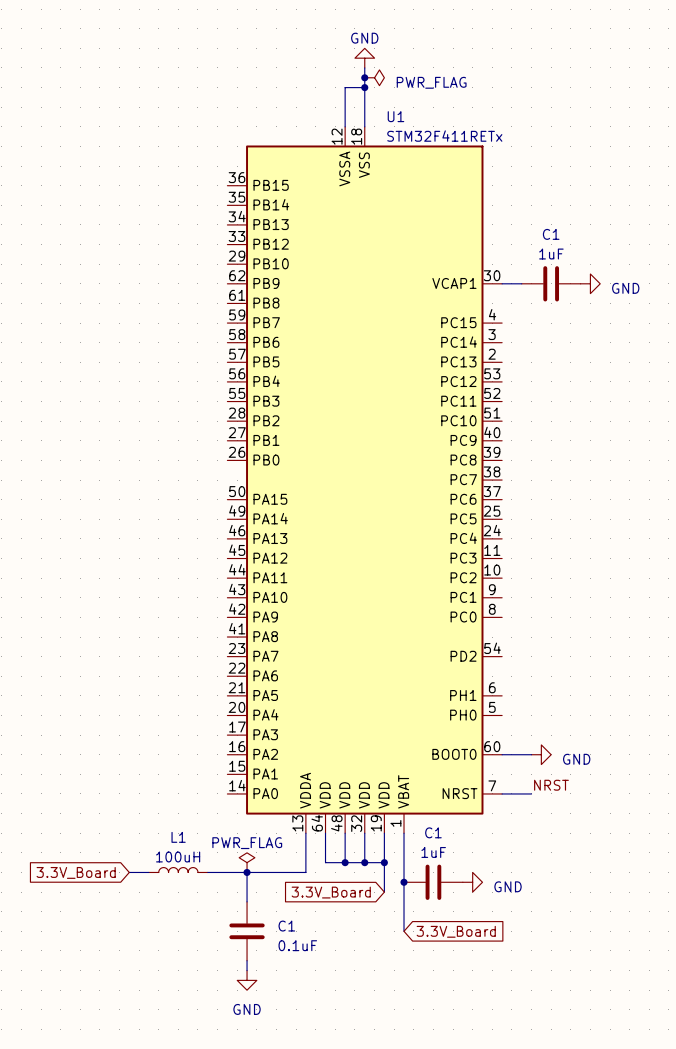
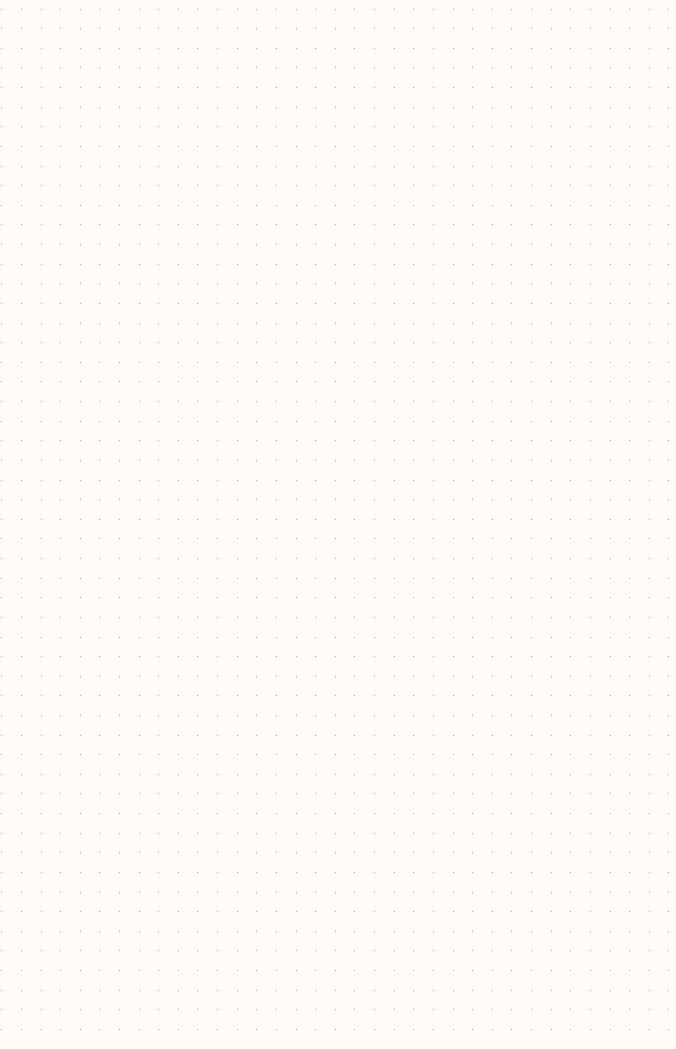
power symbol: GND (364, 58) -> none
wire: (364, 67) (364, 126) -> none
junction: (364, 77) -> none
power symbol: PWR_FLAG (374, 77) -> none
wire: (364, 87) (345, 87) (345, 126) -> none
junction: (364, 87) -> none
wire: (502, 283) (521, 283) -> none
C1: 1uF (551, 283) -> none
power symbol: GND (590, 283) -> none
U1: STM32F411RETx (364, 480) -> none
wire: (502, 754) (531, 754) -> none
power symbol: GND (541, 754) -> none
label: NRST (551, 785) -> none
wire: (502, 793) (531, 793) -> none
wire: (305, 833) (305, 872) (207, 872) -> none
wire: (325, 833) (325, 862) (384, 862) -> none
wire: (345, 833) (345, 862) -> none
wire: (364, 833) (364, 862) -> none
wire: (384, 833) (384, 892) -> none
wire: (404, 833) (404, 931) -> none
power symbol: PWR_FLAG (247, 862) -> none
junction: (345, 862) -> none
junction: (364, 862) -> none
junction: (384, 862) -> none
L1: 100uH (178, 870) -> none
global label: 3.3V_Board (76, 872) -> none
wire: (129, 872) (148, 872) -> none
wire: (247, 872) (247, 901) -> none
junction: (247, 872) -> none
junction: (404, 882) -> none
C1: 1uF (433, 882) -> none
power symbol: GND (472, 882) -> none
global label: 3.3V_Board (331, 892) -> none
C1: 0.1uF (247, 931) -> none
global label: 3.3V_Board (456, 931) -> none
wire: (247, 960) (247, 970) -> none
power symbol: GND (247, 980) -> none

